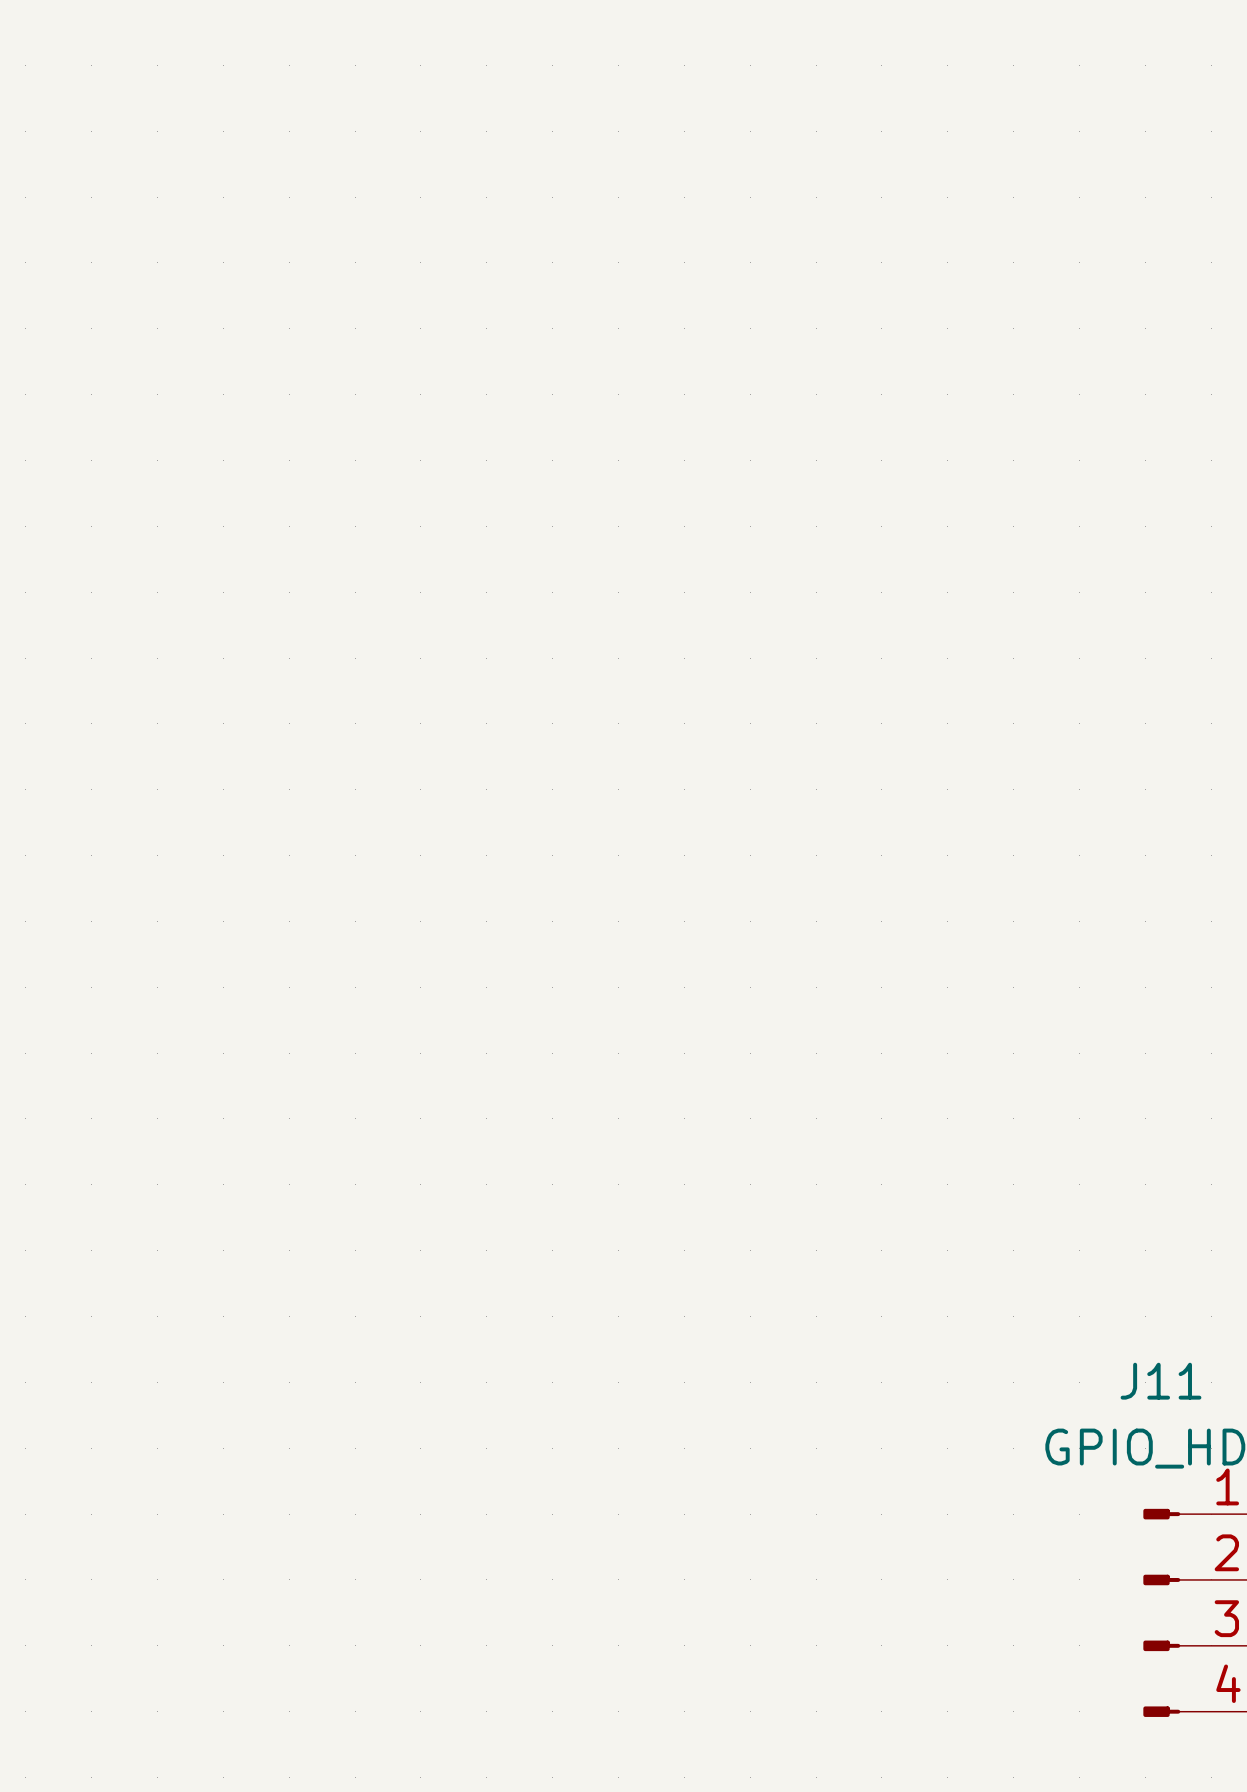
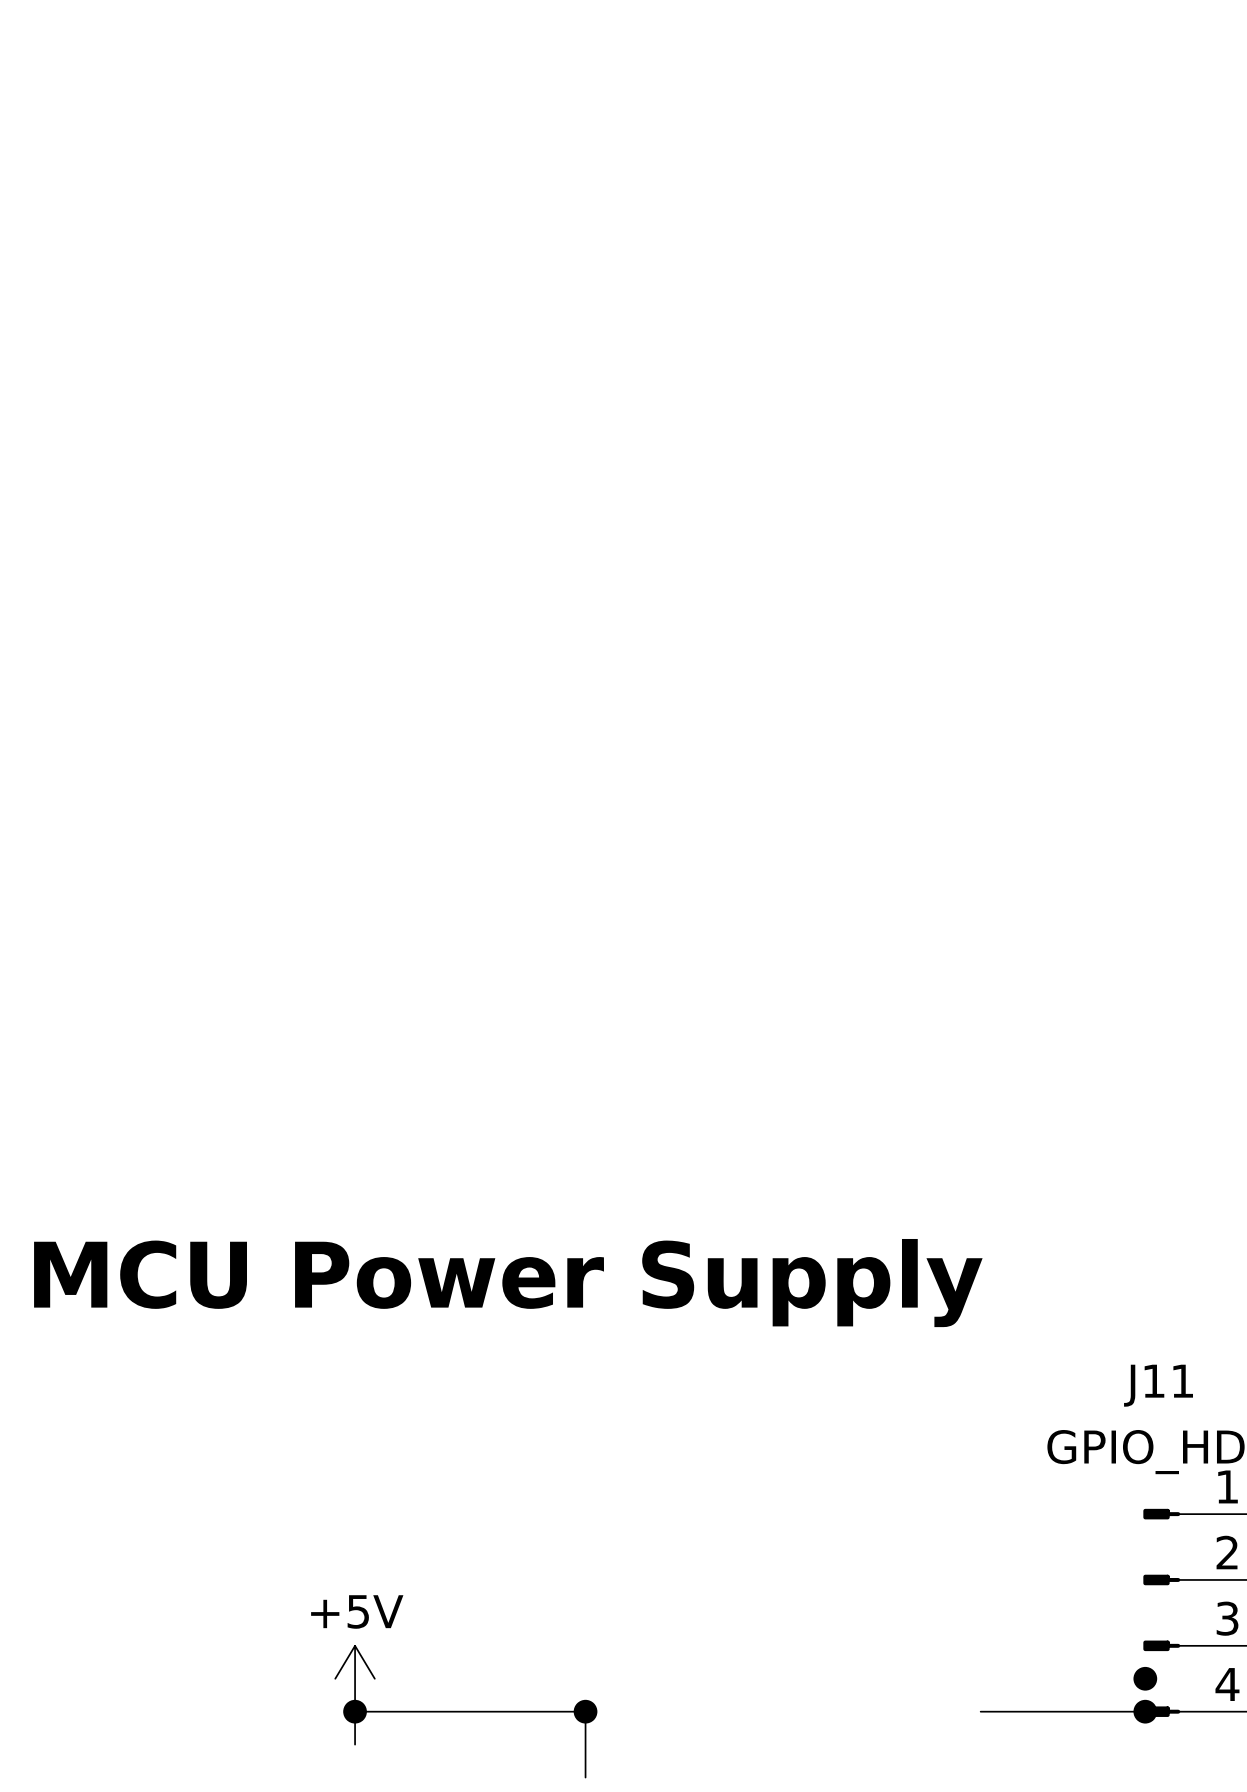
text: none -> MCU Power Supply (508, 1283)
power symbol: none -> +5V (355, 1678)
junction: none -> (1145, 1678)
junction: none -> (355, 1711)
junction: none -> (585, 1711)
wire: none -> (980, 1711) (1145, 1711)
junction: none -> (1145, 1711)
wire: none -> (355, 1744) (355, 1711) (585, 1711) (585, 1777)

